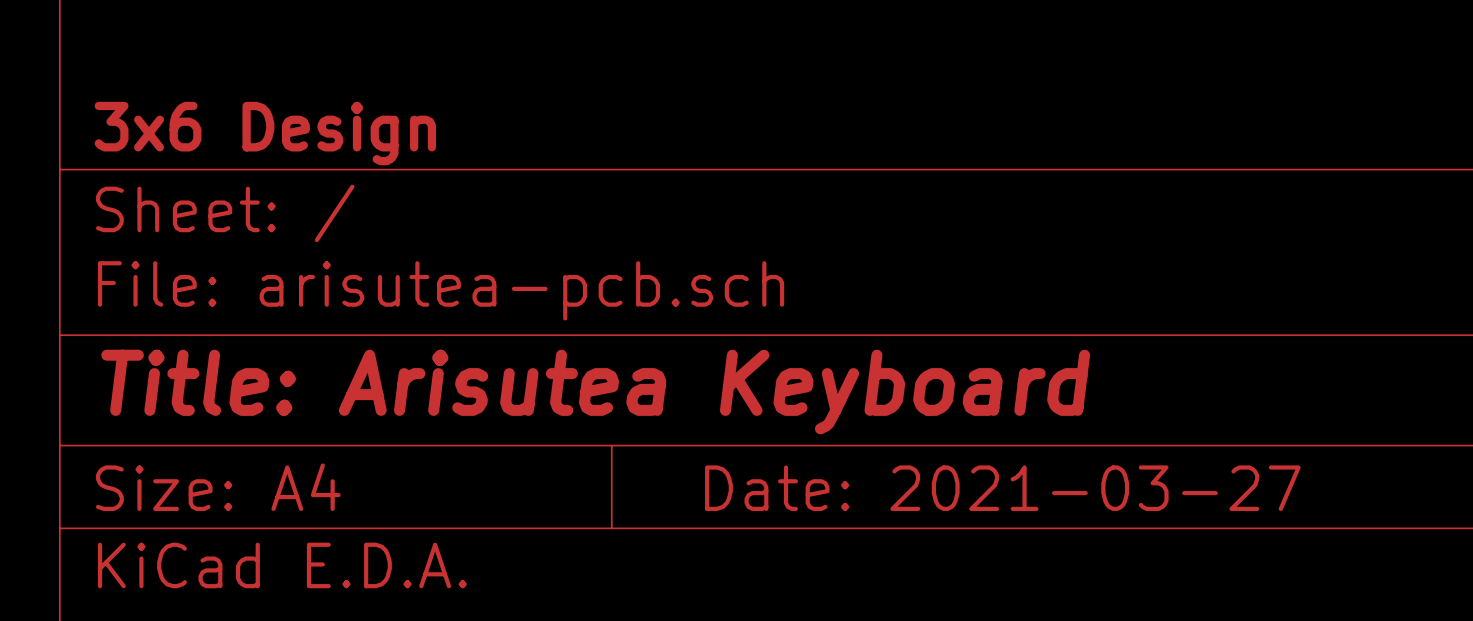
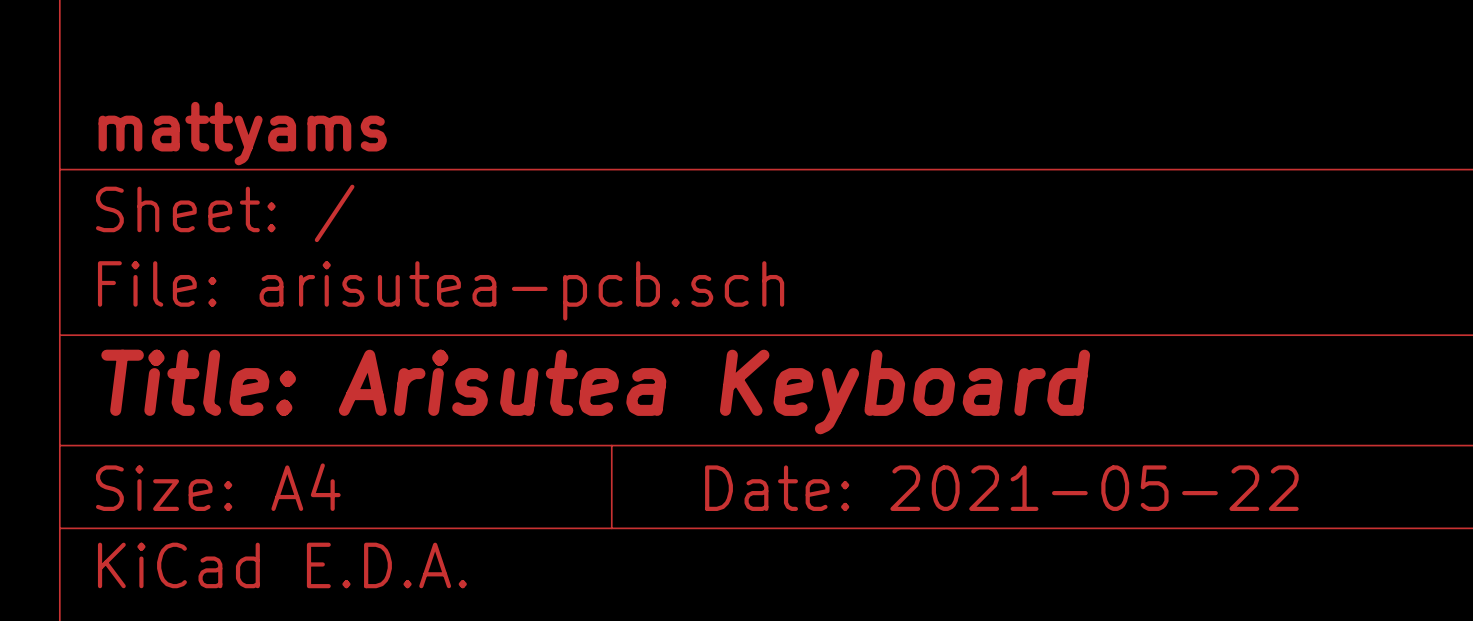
title block: 3x6 Design (265, 133) -> mattyams (242, 133)
title block: Date: 2021-03-27 (1002, 488) -> Date: 2021-05-22 (1001, 488)

